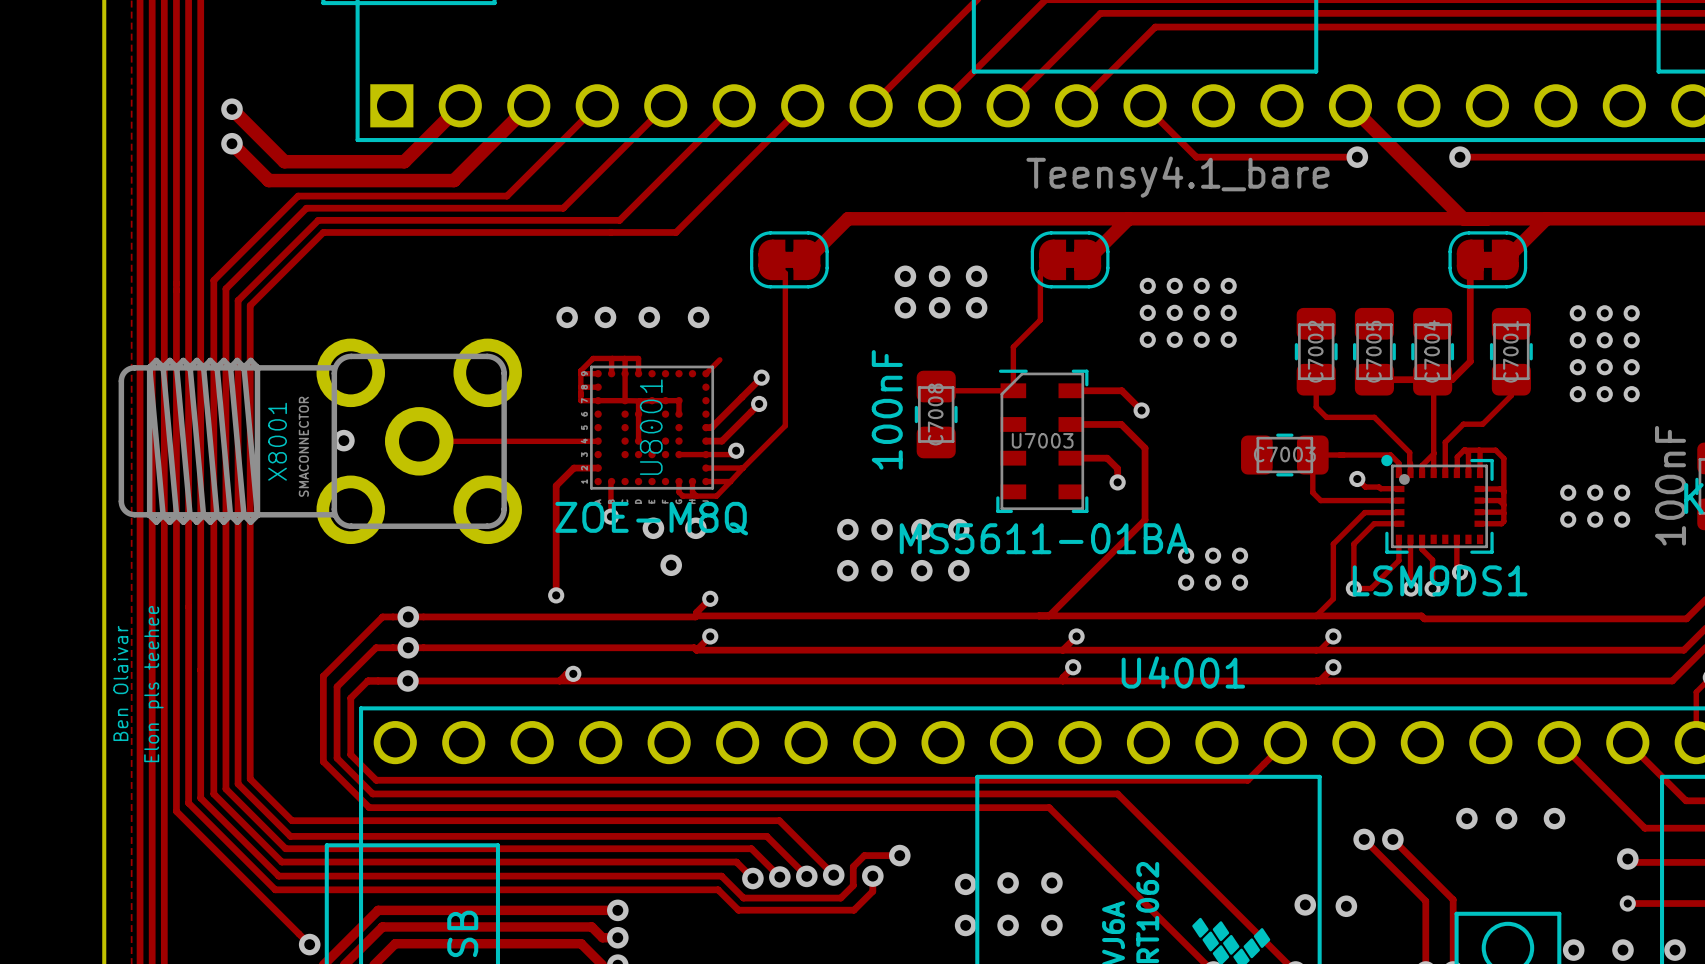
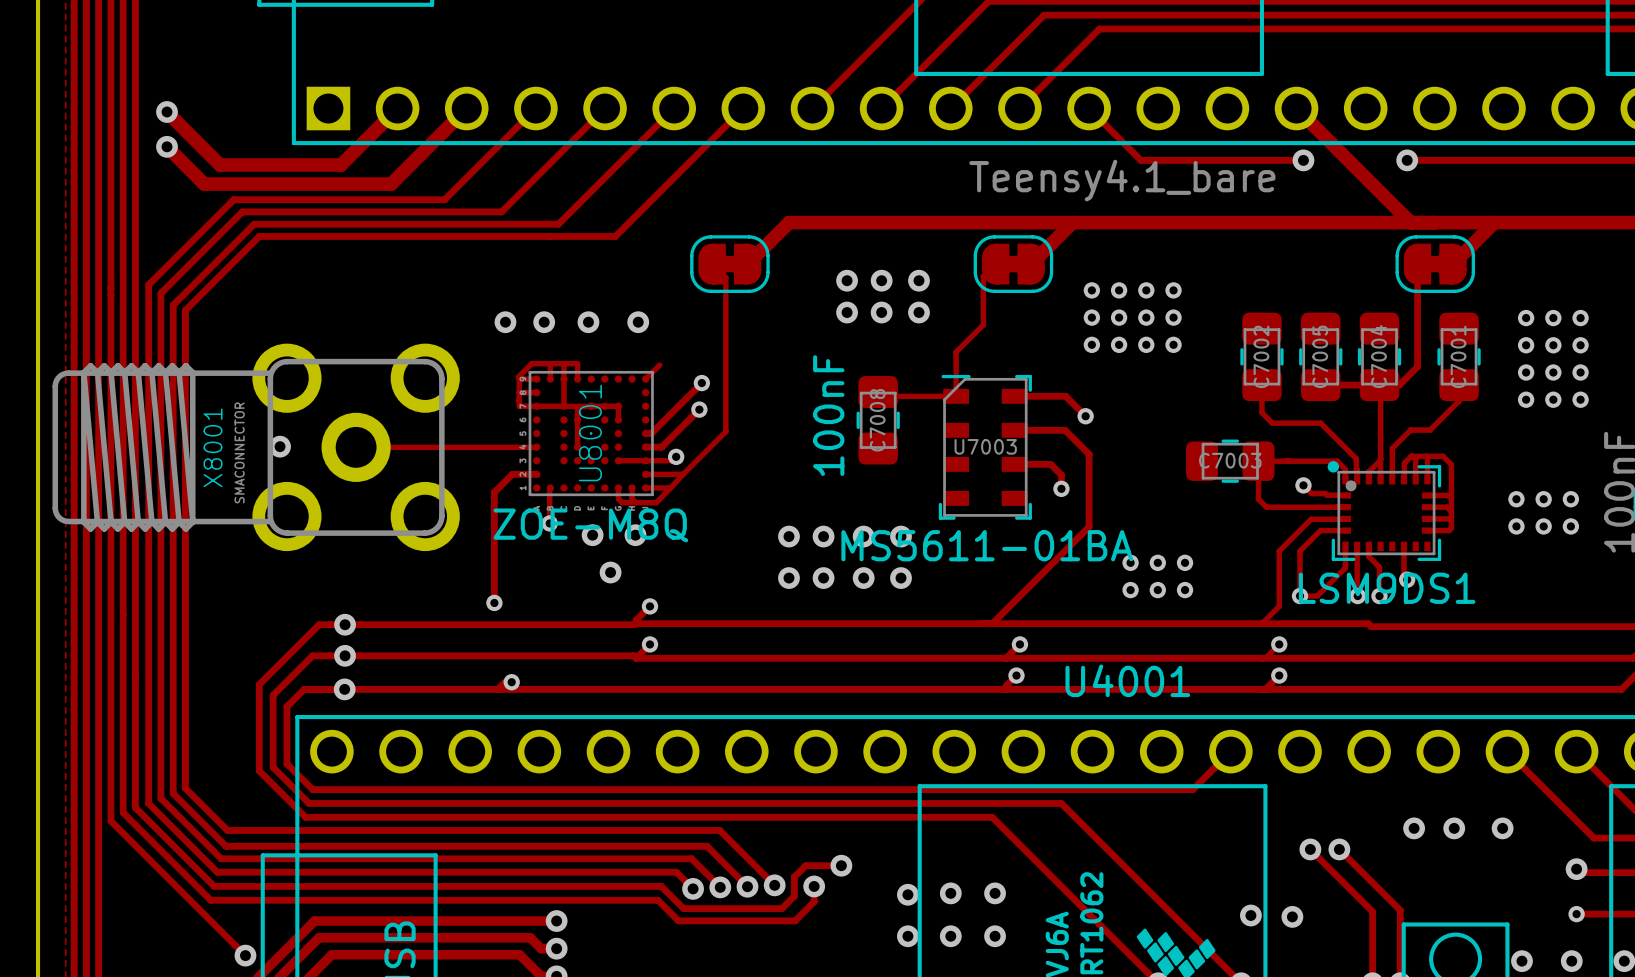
text: Ben Olaivar (120, 683) -> none
text: Elon pls teehee (153, 684) -> none

